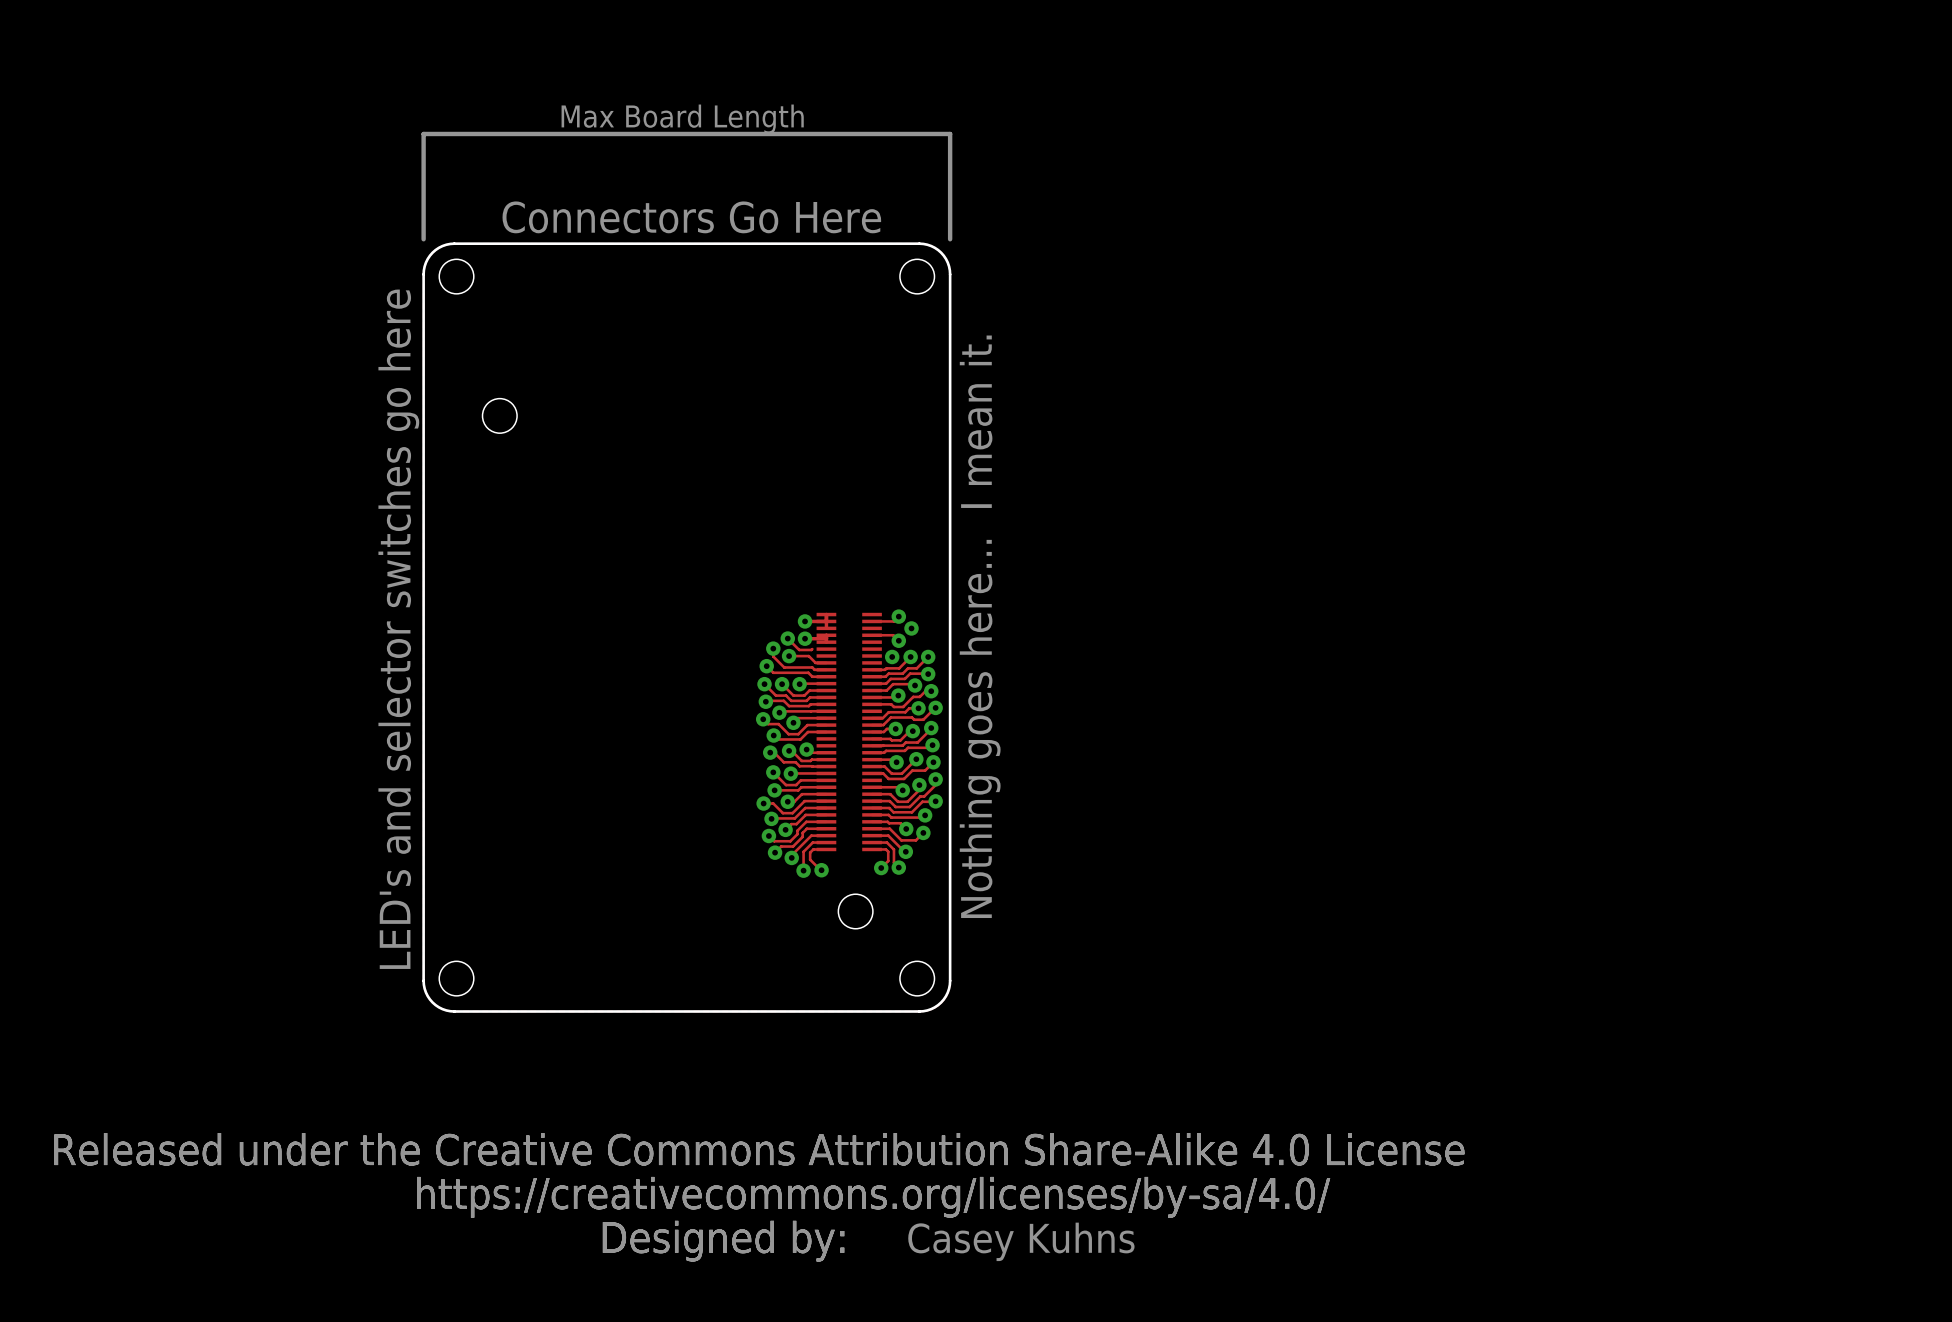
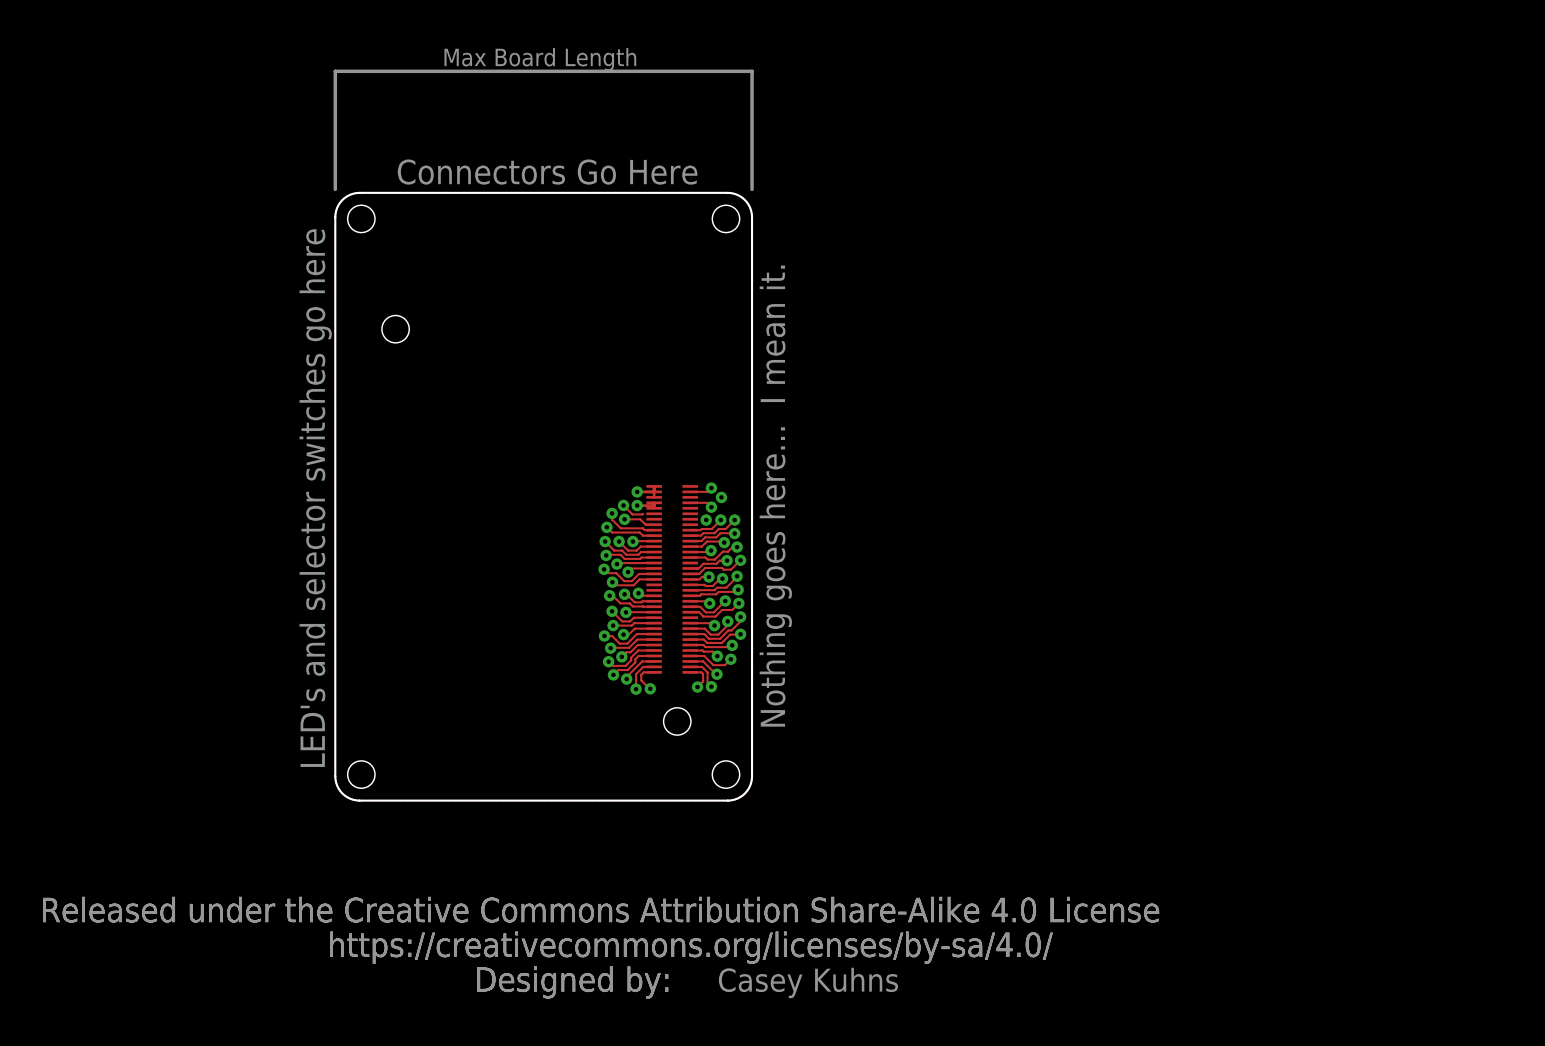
text position: Max Board Length (682, 119) -> Max Board Length (540, 59)
line: (423, 133) (950, 133) -> (335, 106) (335, 71) (752, 71) (752, 106)

